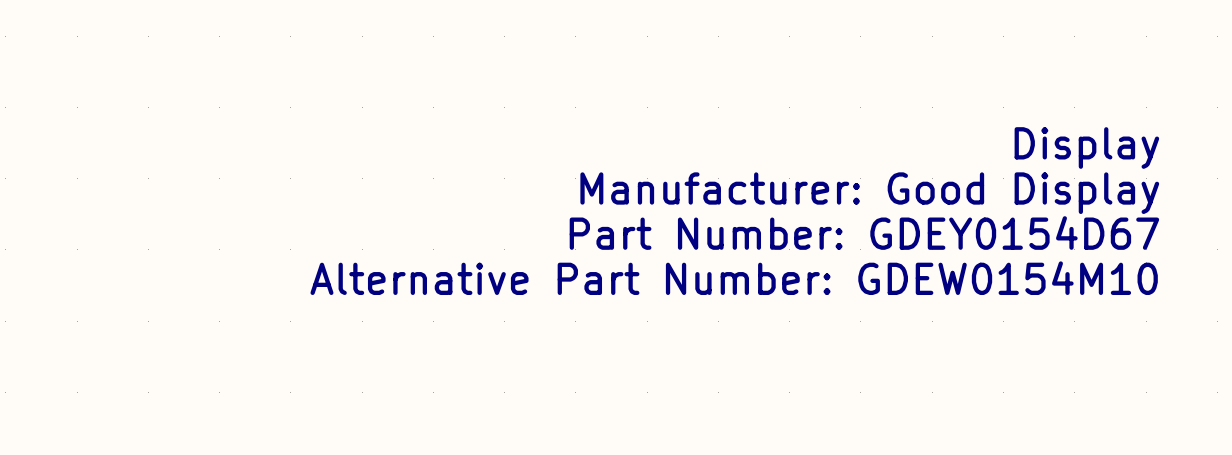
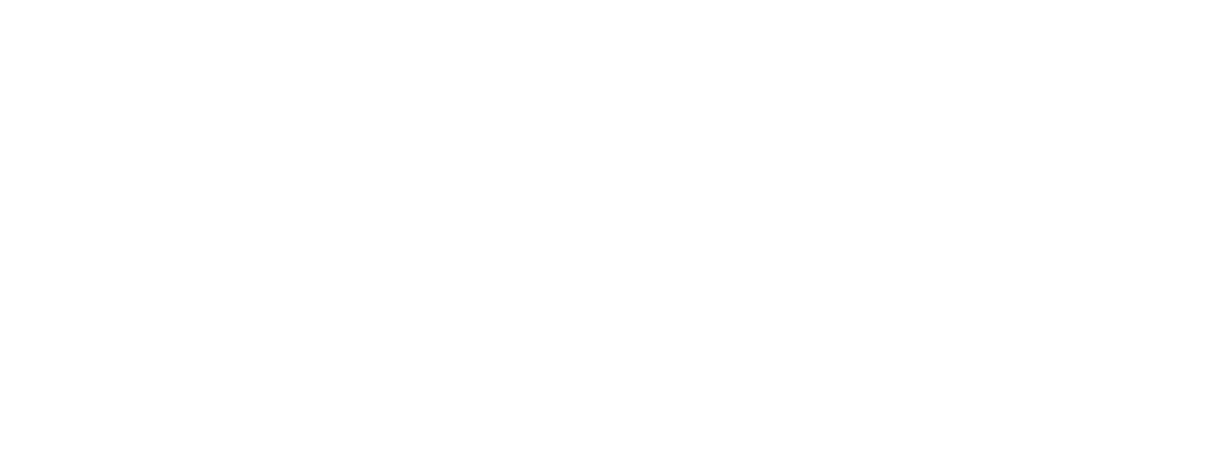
text: Display (1086, 148) -> none
text: Manufacturer: Good Display (869, 193) -> none
text: Part Number: GDEY0154D67 (864, 233) -> none
text: Alternative Part Number: GDEW0154M10 (734, 278) -> none

